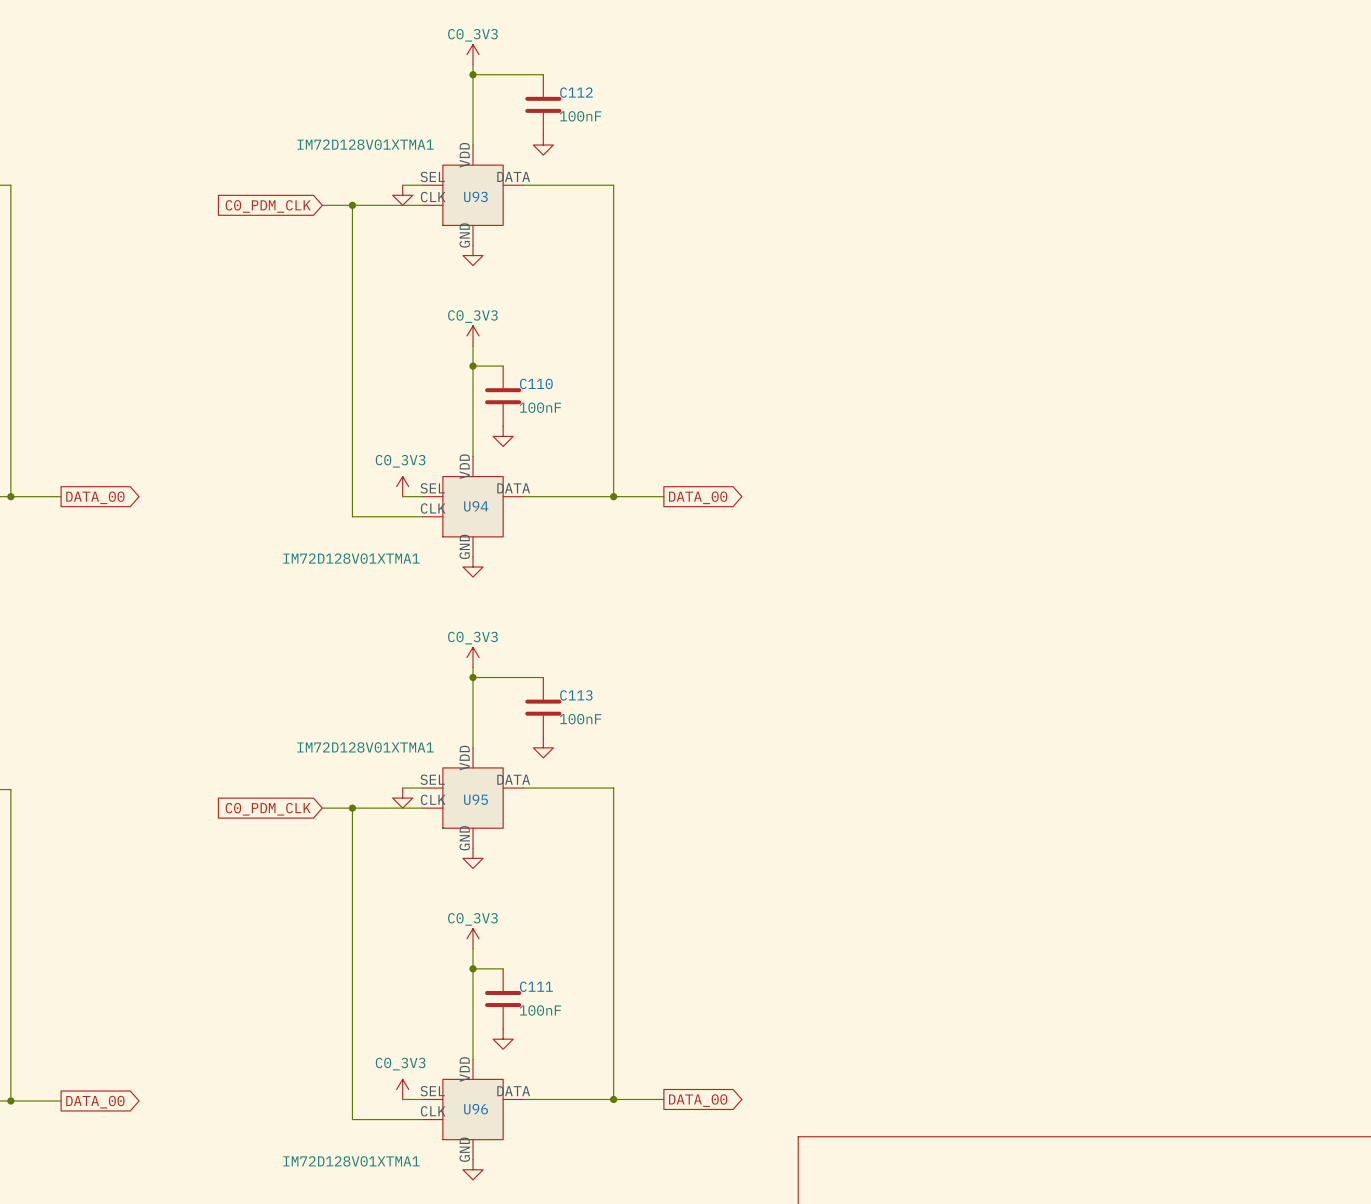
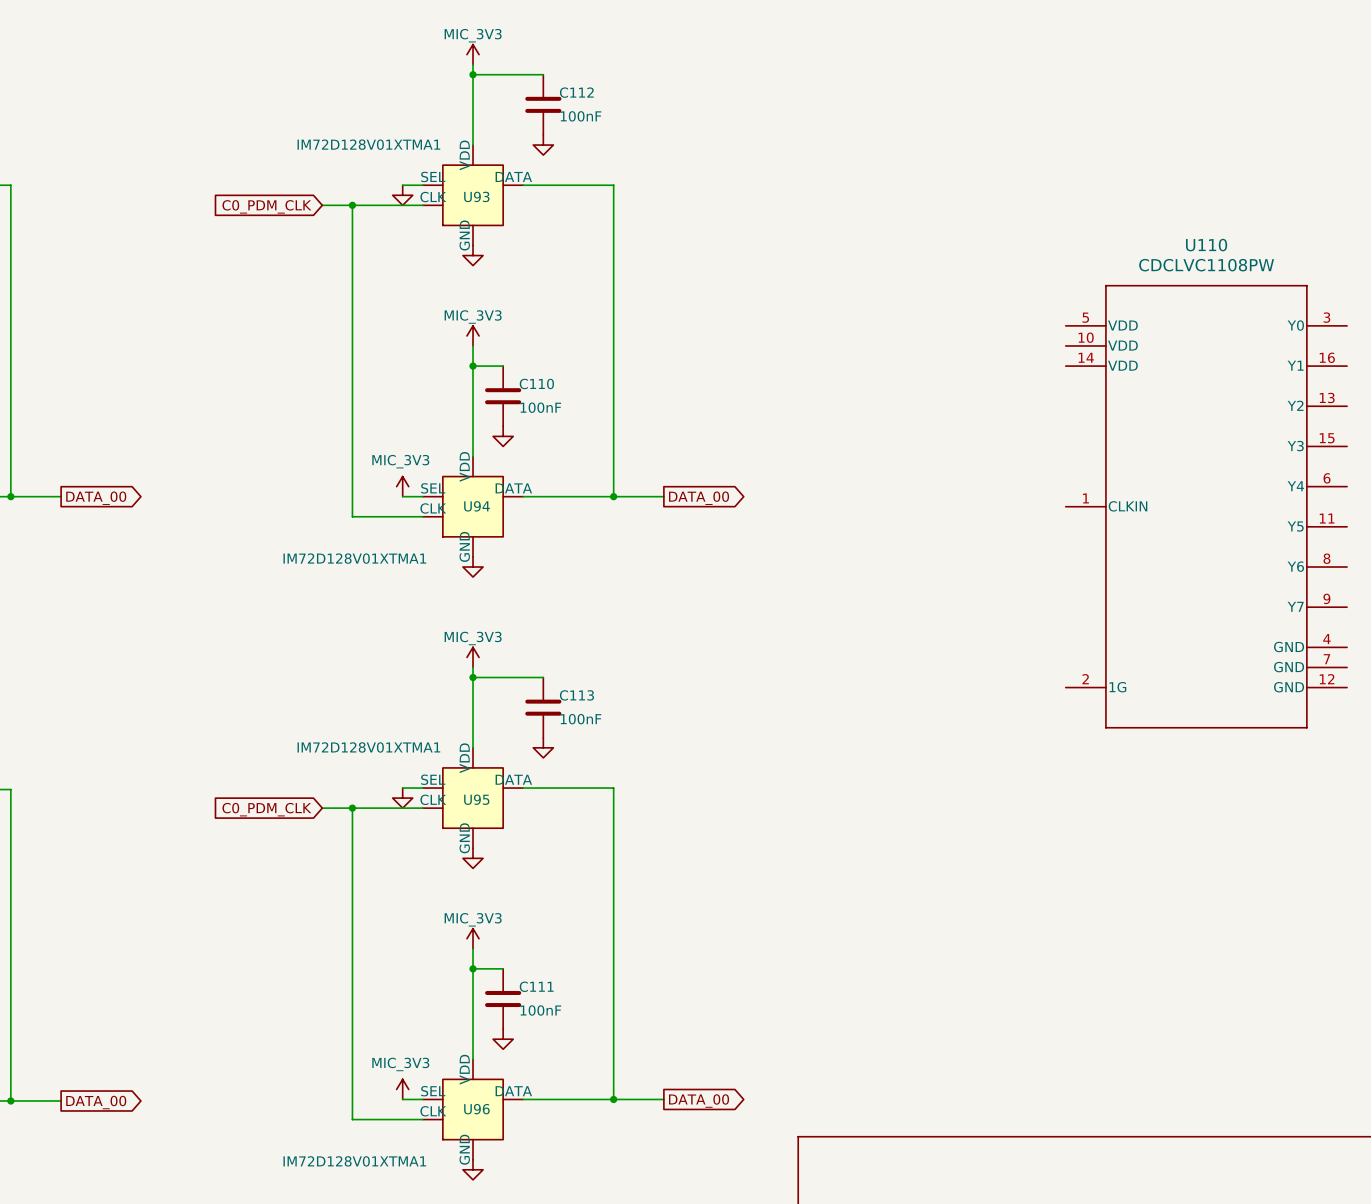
power symbol: C0_3V3 (473, 54) -> MIC_3V3 (473, 54)
power symbol: C0_3V3 (473, 335) -> MIC_3V3 (473, 335)
power symbol: C0_3V3 (402, 486) -> MIC_3V3 (402, 486)
U110: none -> CDCLVC1108PW (1206, 506)
power symbol: C0_3V3 (473, 657) -> MIC_3V3 (473, 657)
power symbol: C0_3V3 (473, 938) -> MIC_3V3 (473, 938)
power symbol: C0_3V3 (402, 1089) -> MIC_3V3 (402, 1089)

